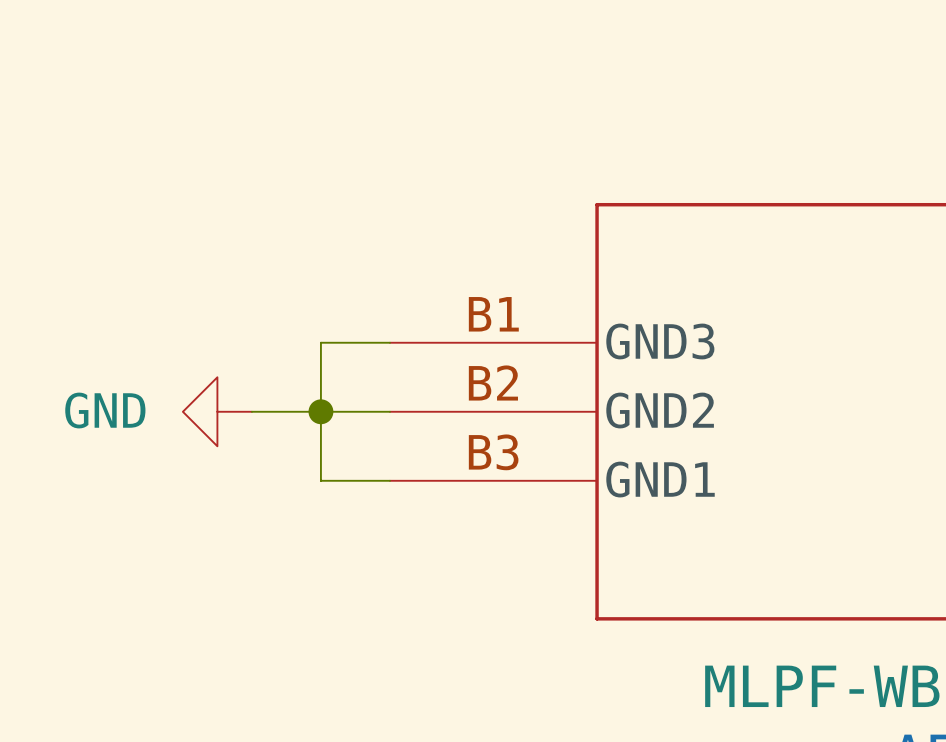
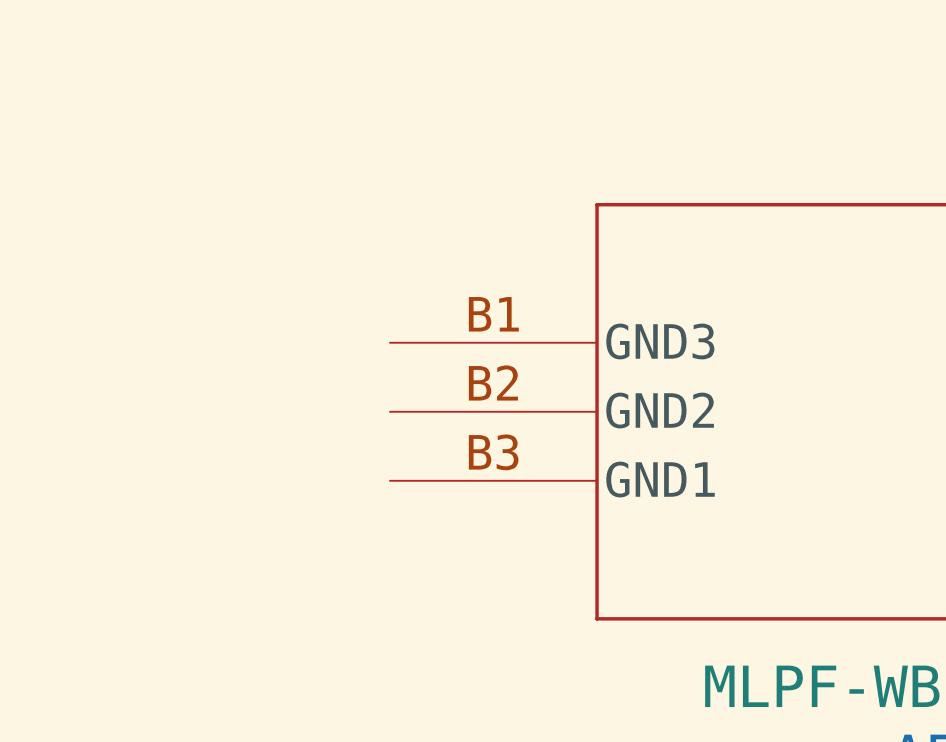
wire: (389, 342) (320, 342) (320, 480) (389, 480) -> none
power symbol: GND (217, 411) -> none
wire: (251, 411) (389, 411) -> none
junction: (320, 411) -> none

